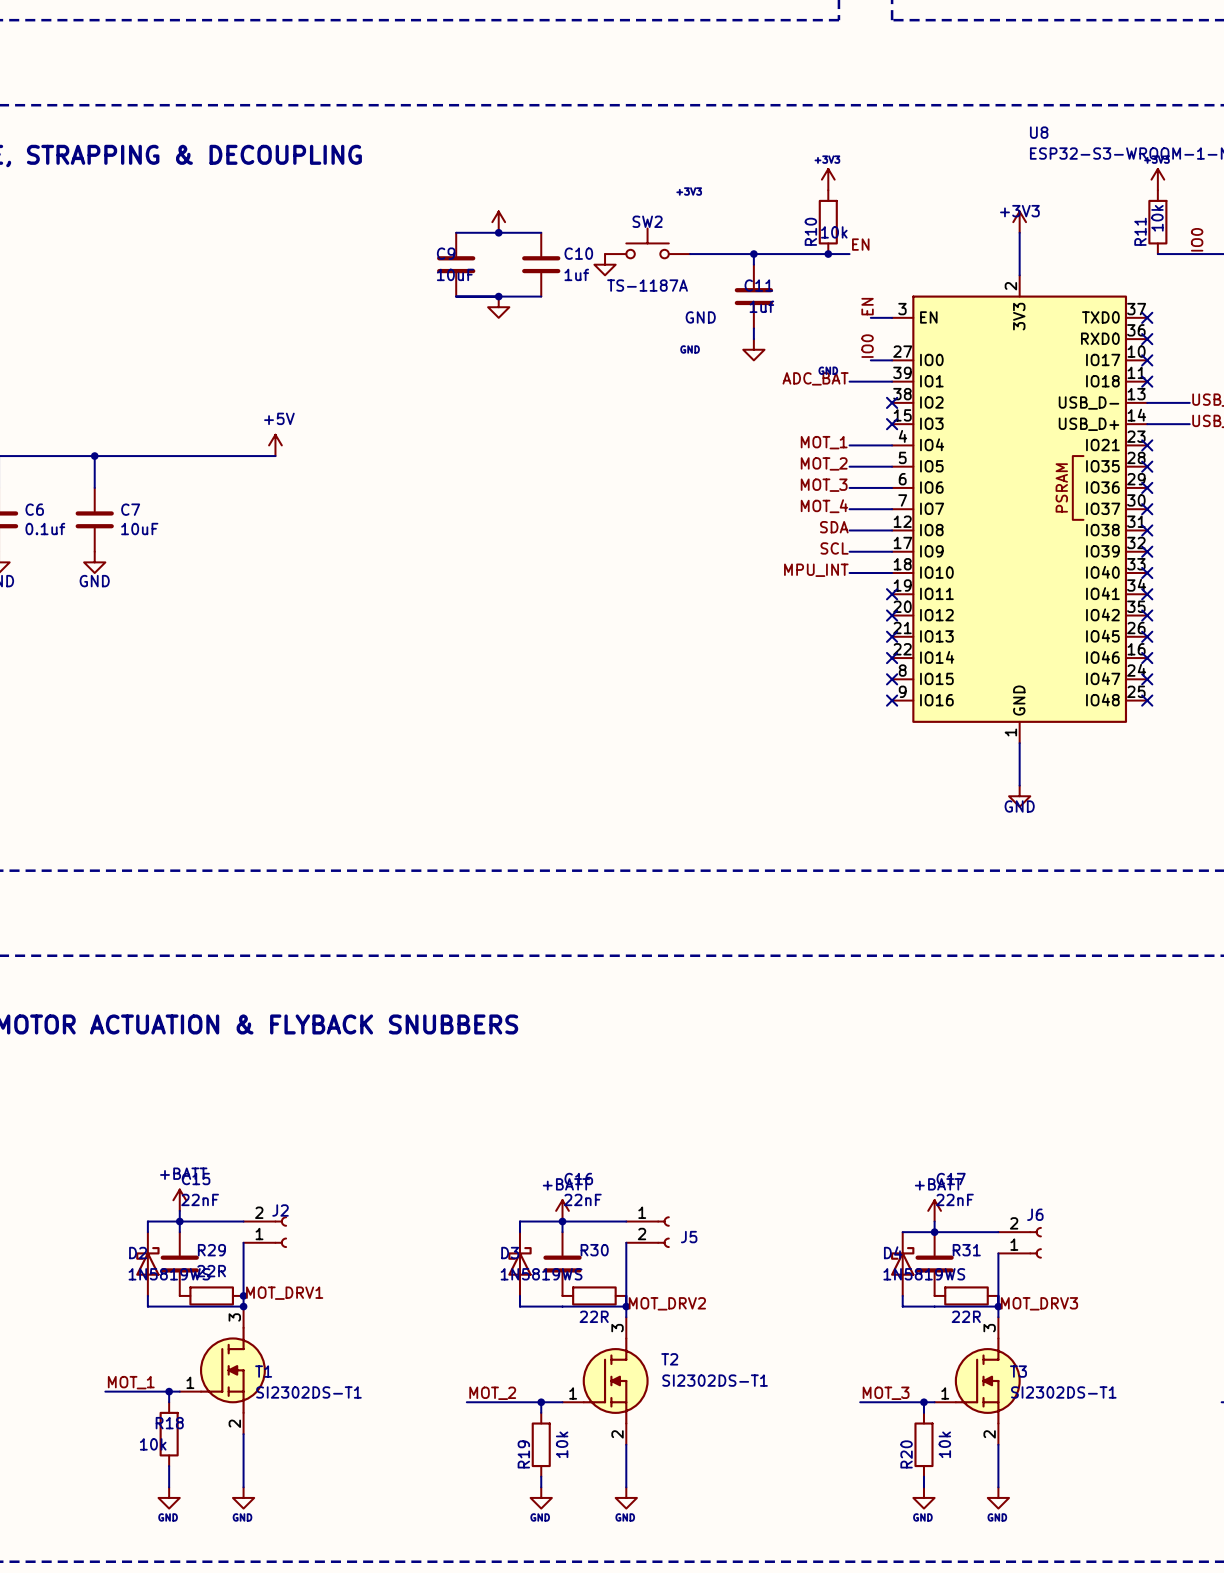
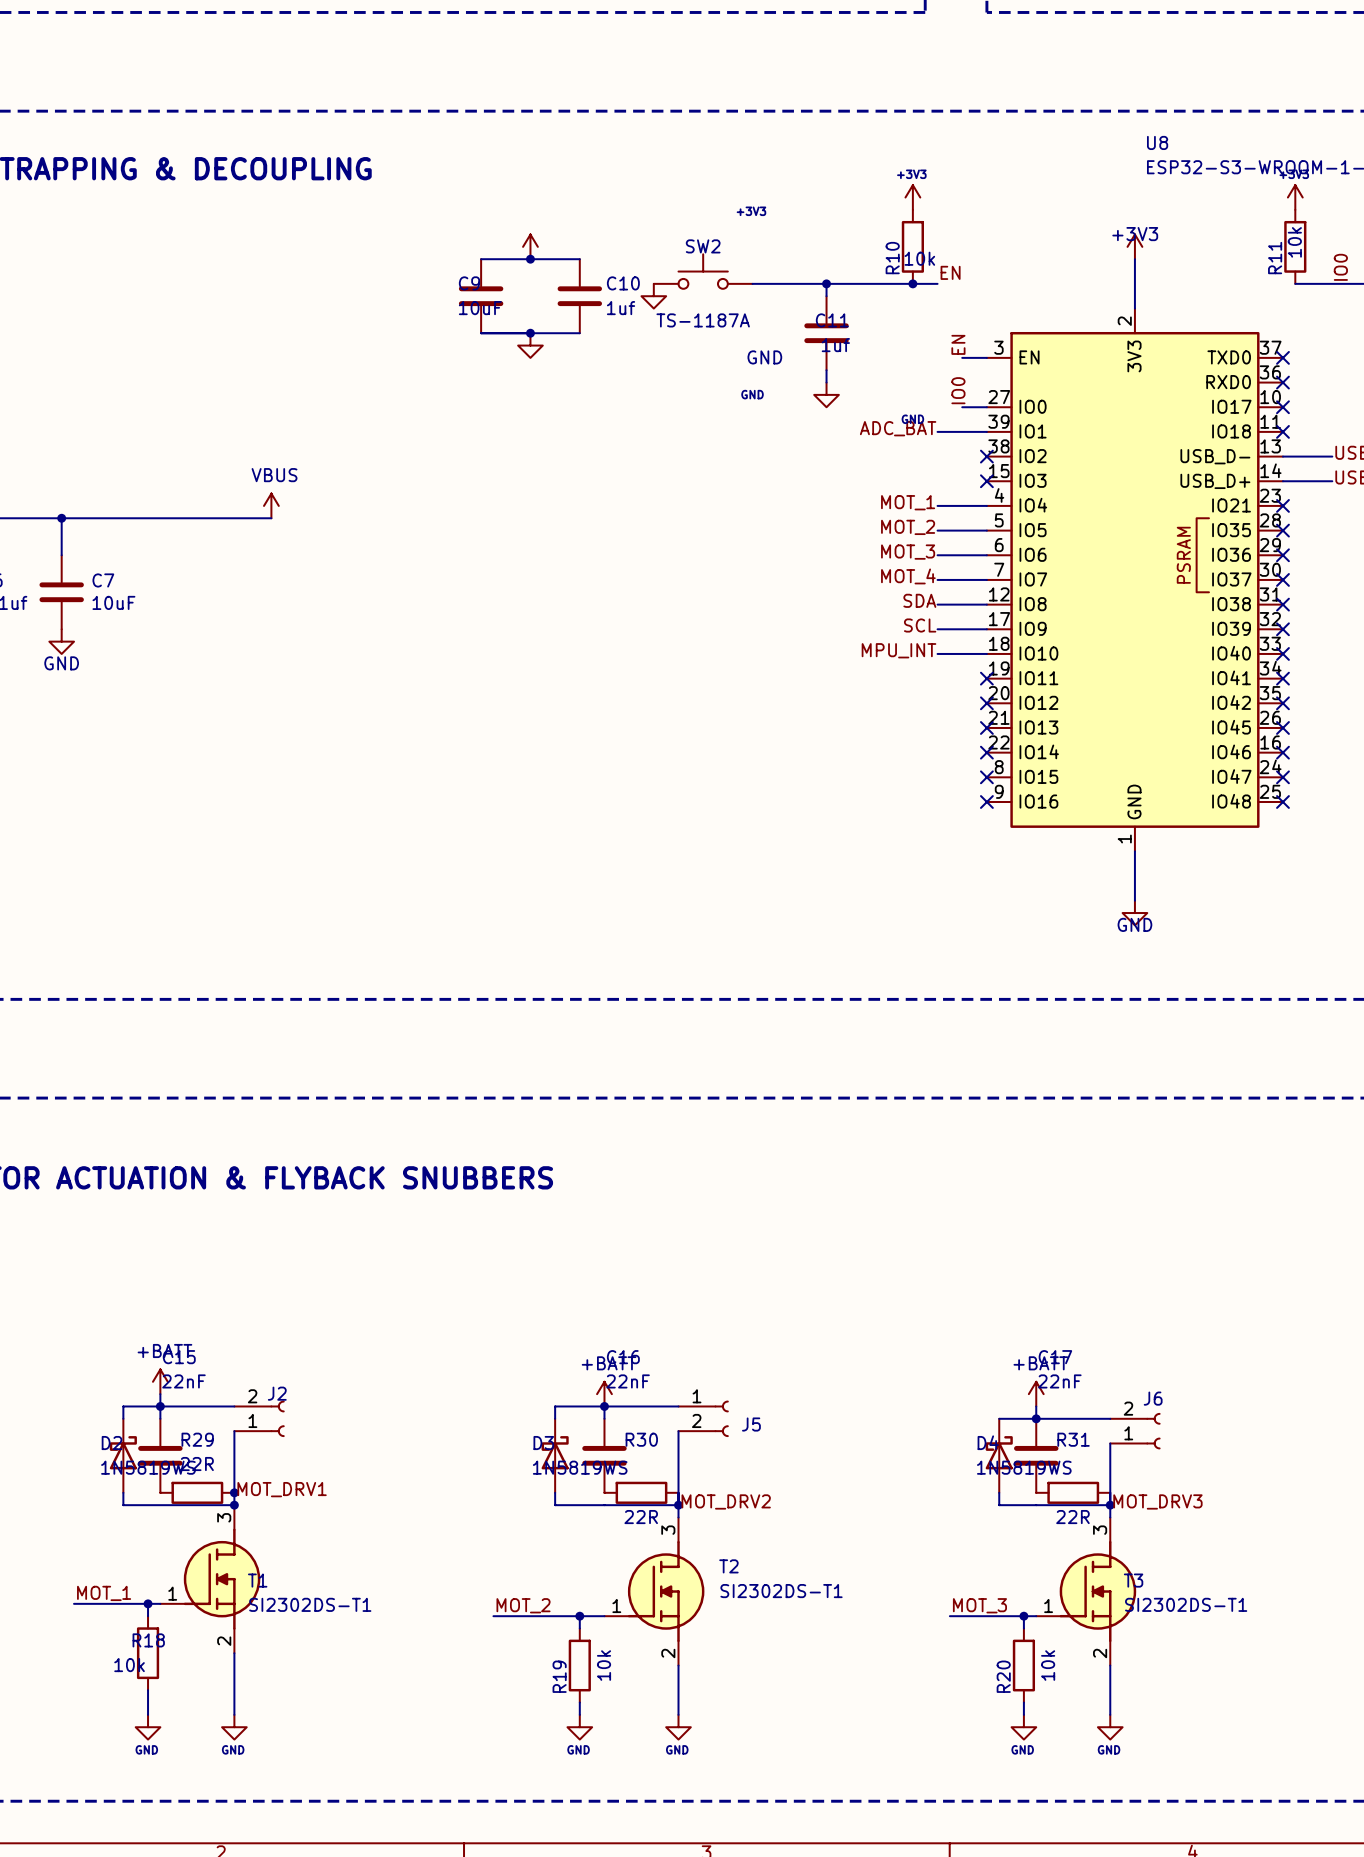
power symbol: +5V (275, 445) -> VBUS (271, 505)

